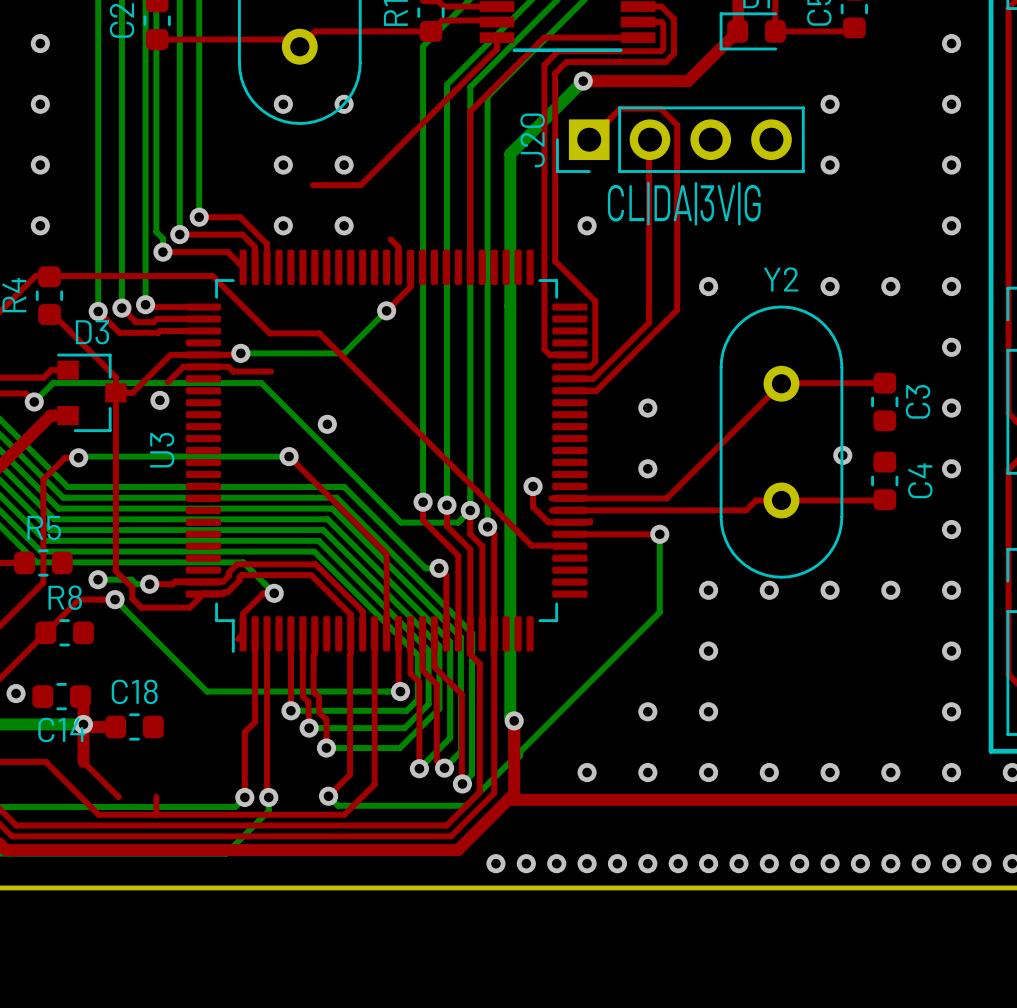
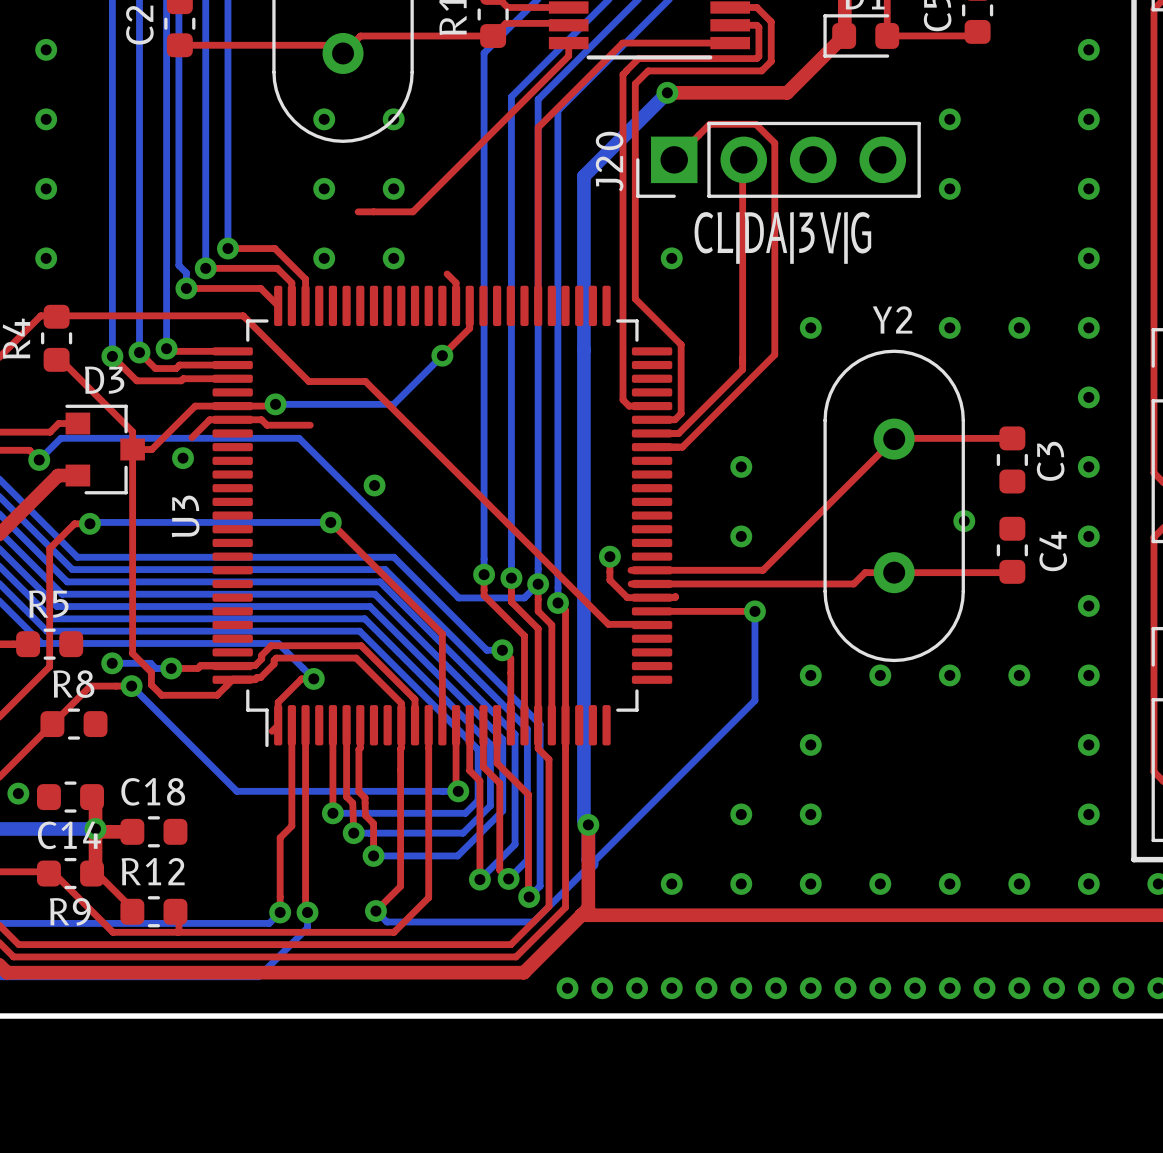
R9: none -> (70, 873)
R12: none -> (153, 911)

